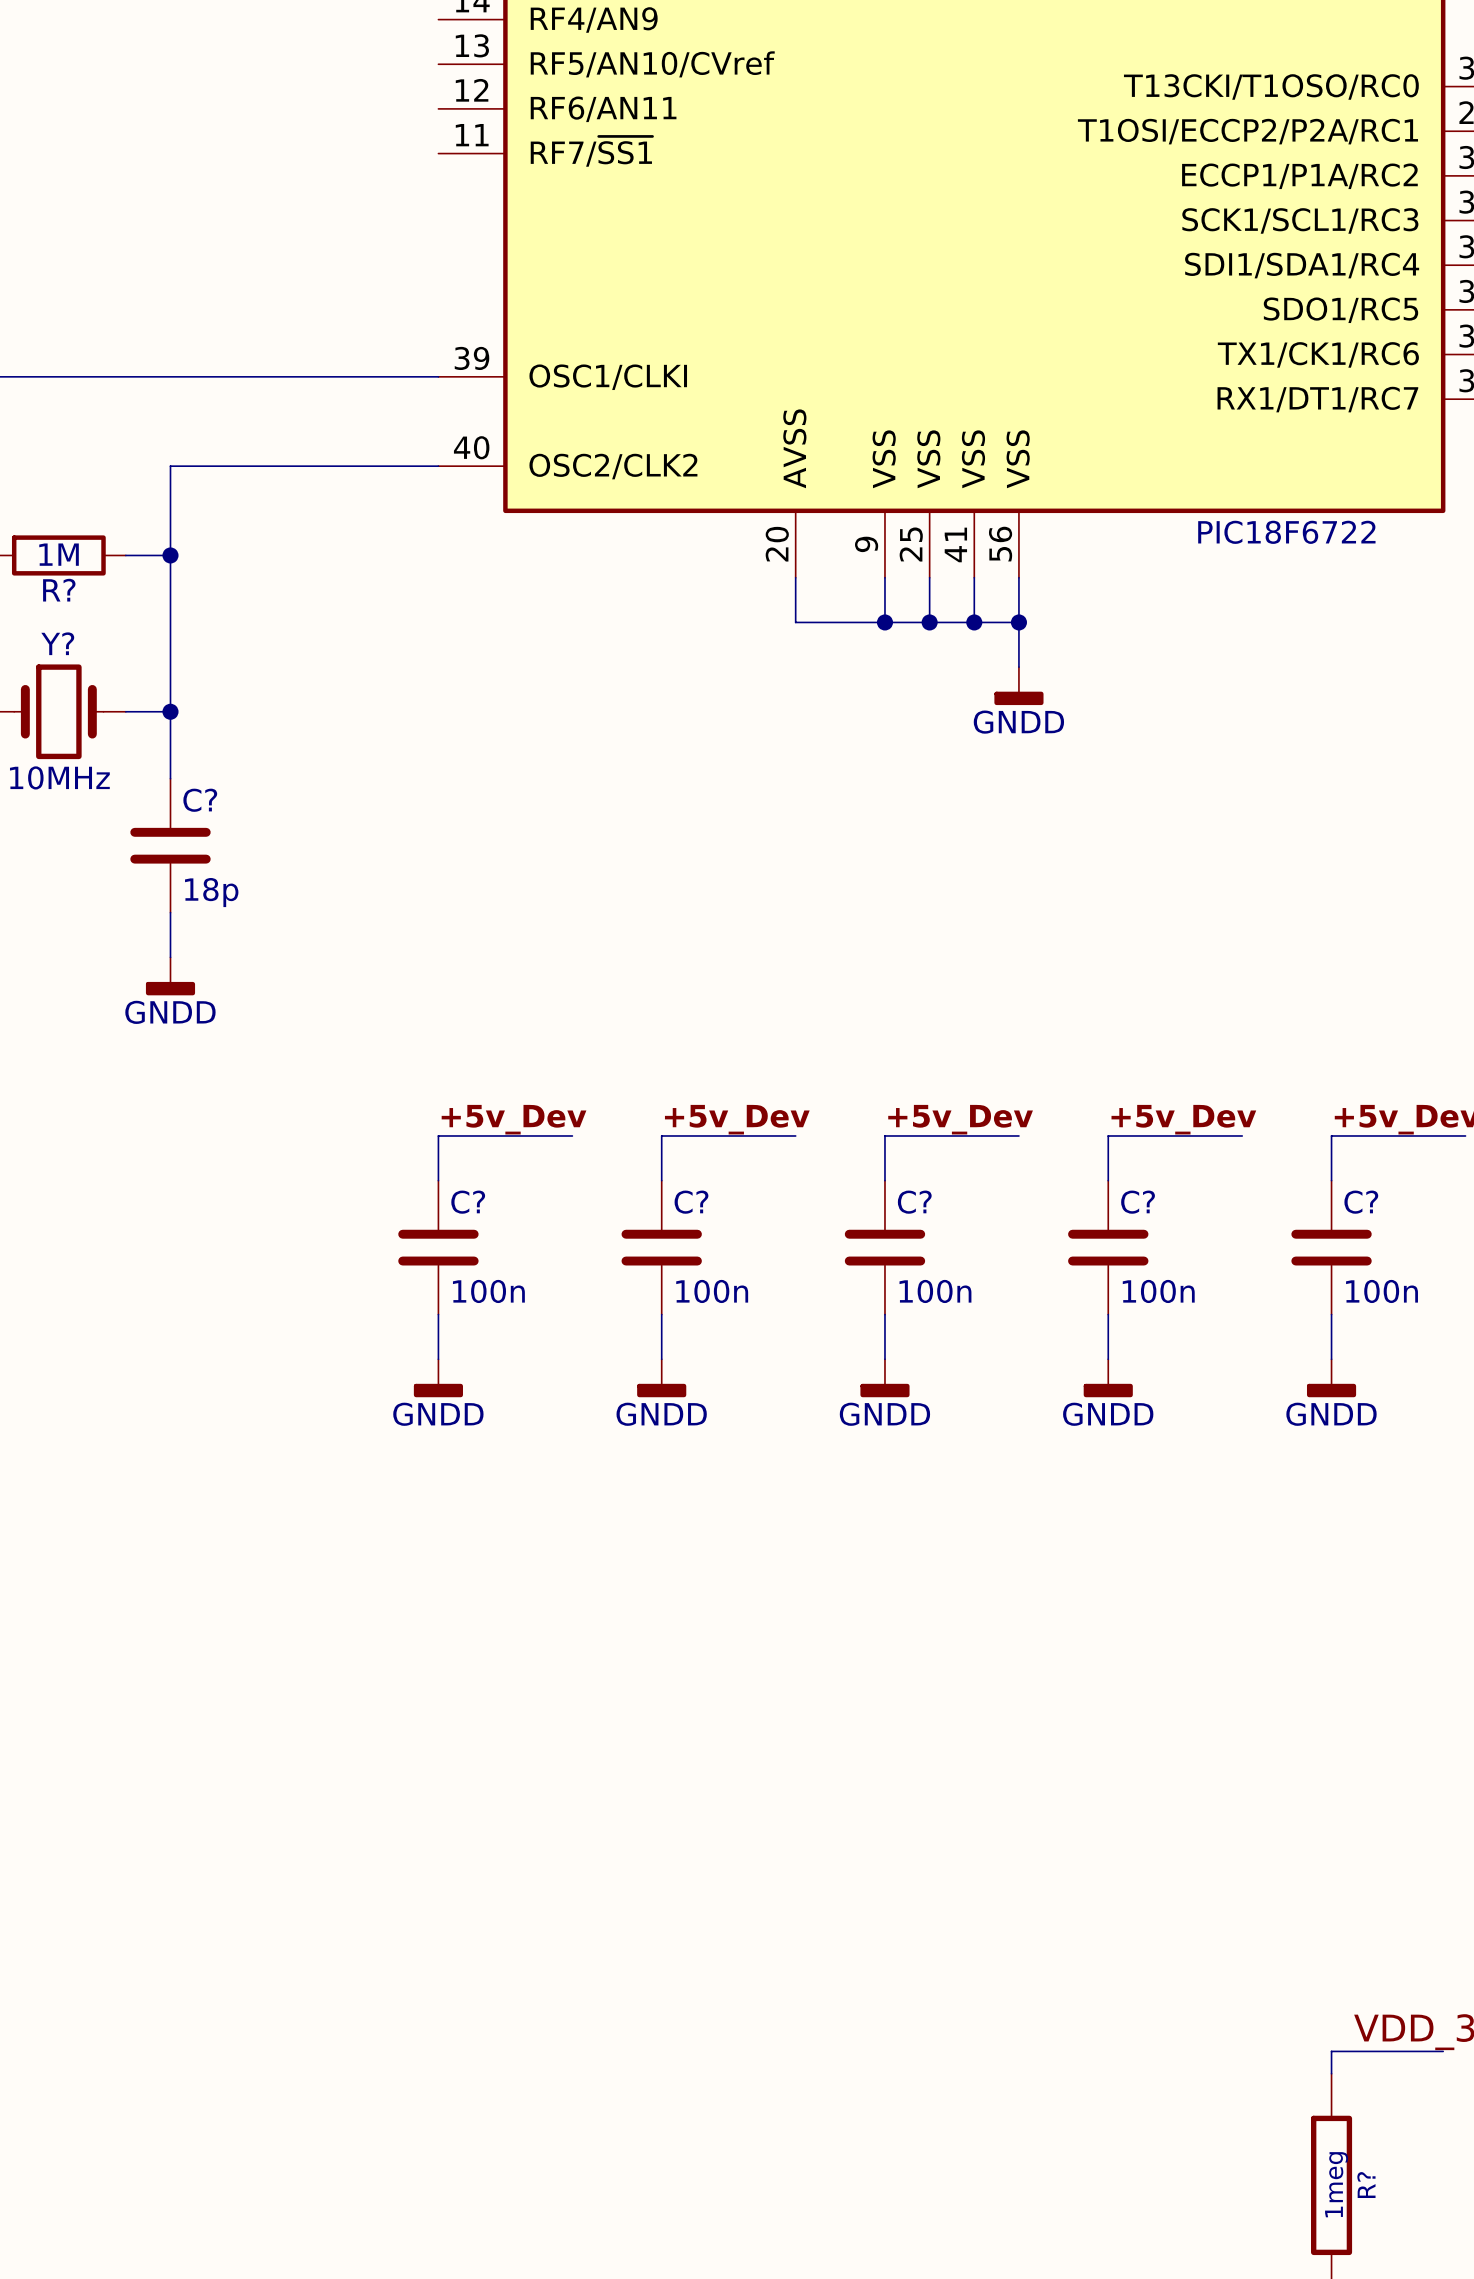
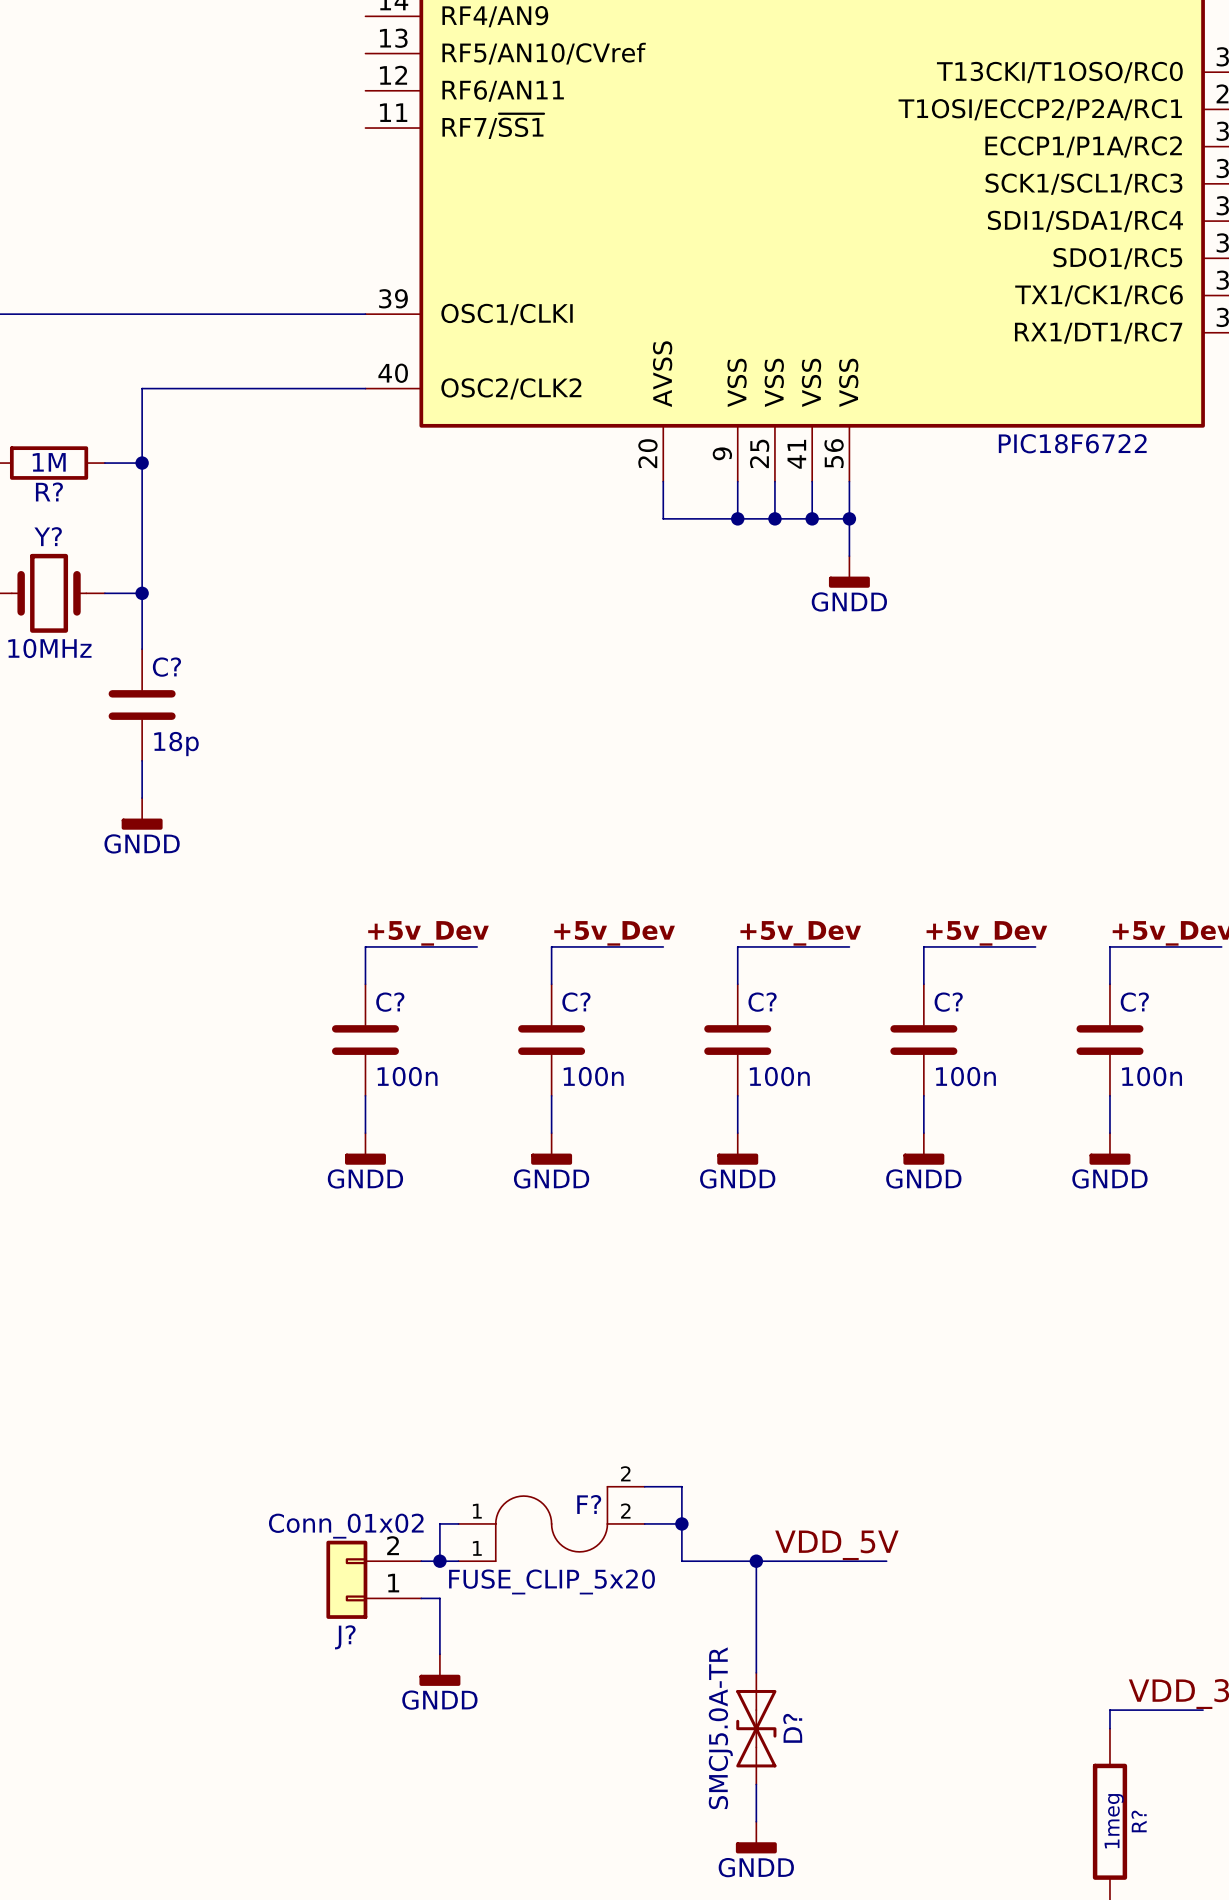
wire: none -> (644, 1486) (681, 1486) (681, 1561) (886, 1561)
wire: none -> (458, 1523) (439, 1523) (439, 1561)
F?: none -> FUSE_CLIP_5x20 (551, 1523)
wire: none -> (644, 1523) (681, 1523)
junction: none -> (681, 1523)
label: none -> VDD_5V (836, 1545)
wire: none -> (421, 1561) (458, 1561)
junction: none -> (439, 1561)
wire: none -> (756, 1561) (756, 1672)
junction: none -> (756, 1561)
J?: none -> Conn_01x02 (373, 1579)
wire: none -> (421, 1598) (439, 1598) (439, 1654)
power symbol: none -> GNDD (439, 1670)
D?: none -> SMCJ5.0A-TR (756, 1728)
wire: none -> (756, 1784) (756, 1821)
power symbol: none -> GNDD (756, 1837)

